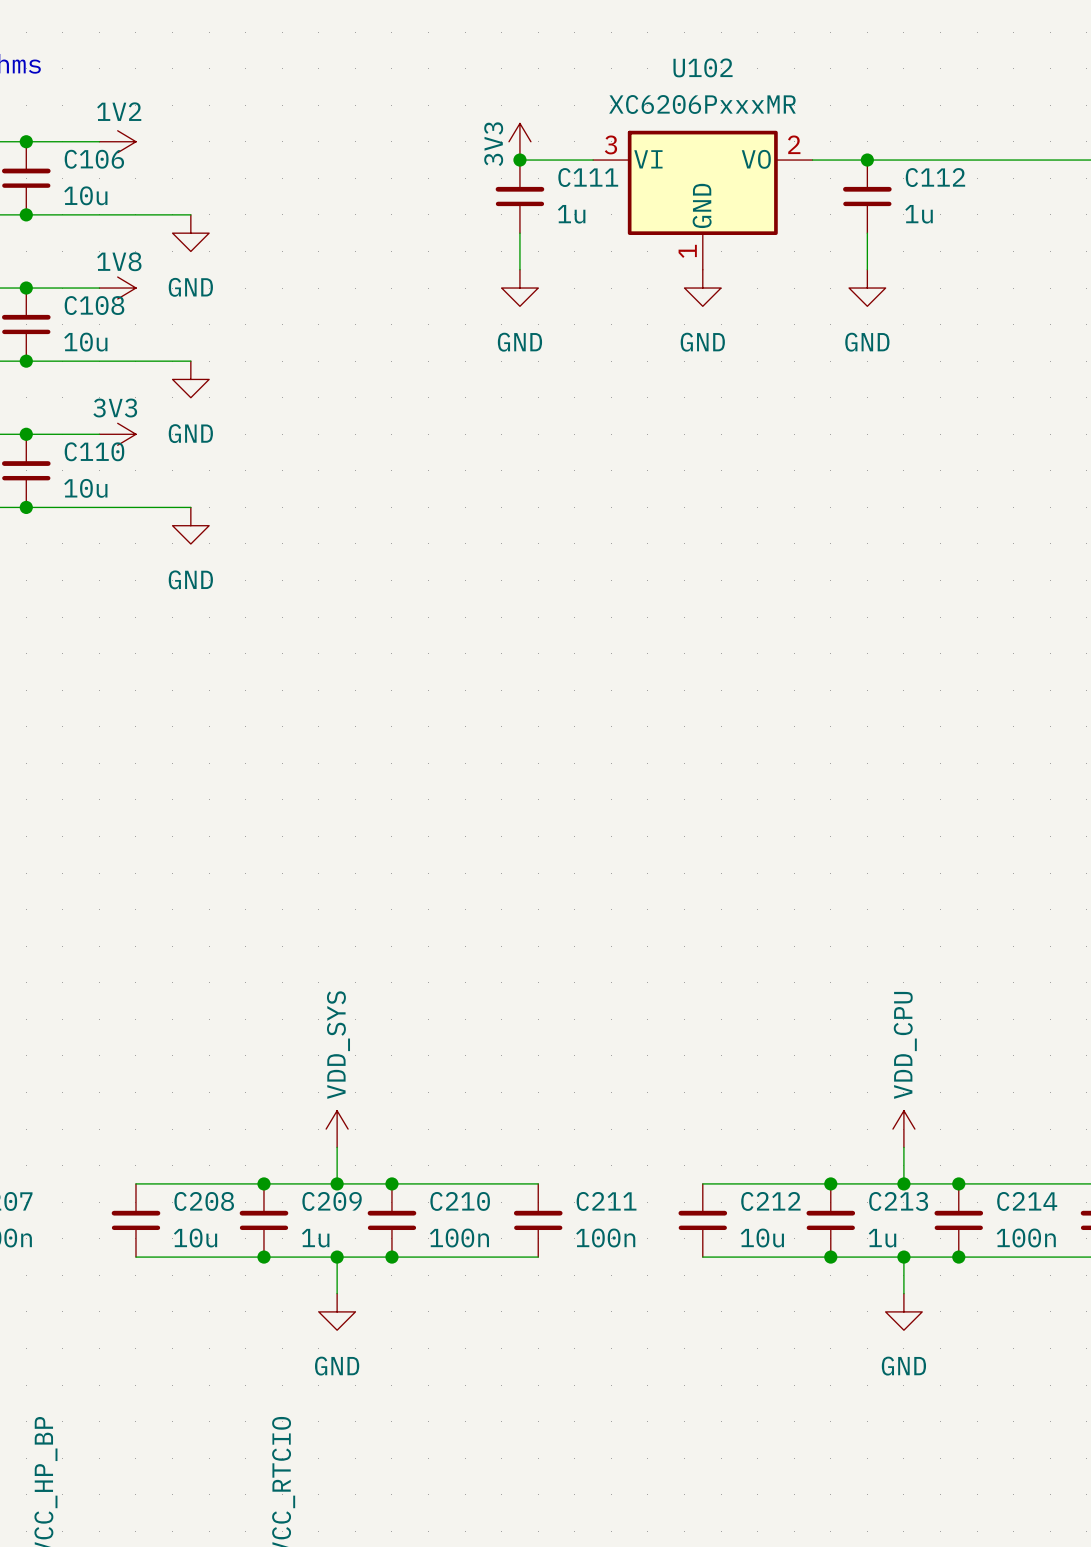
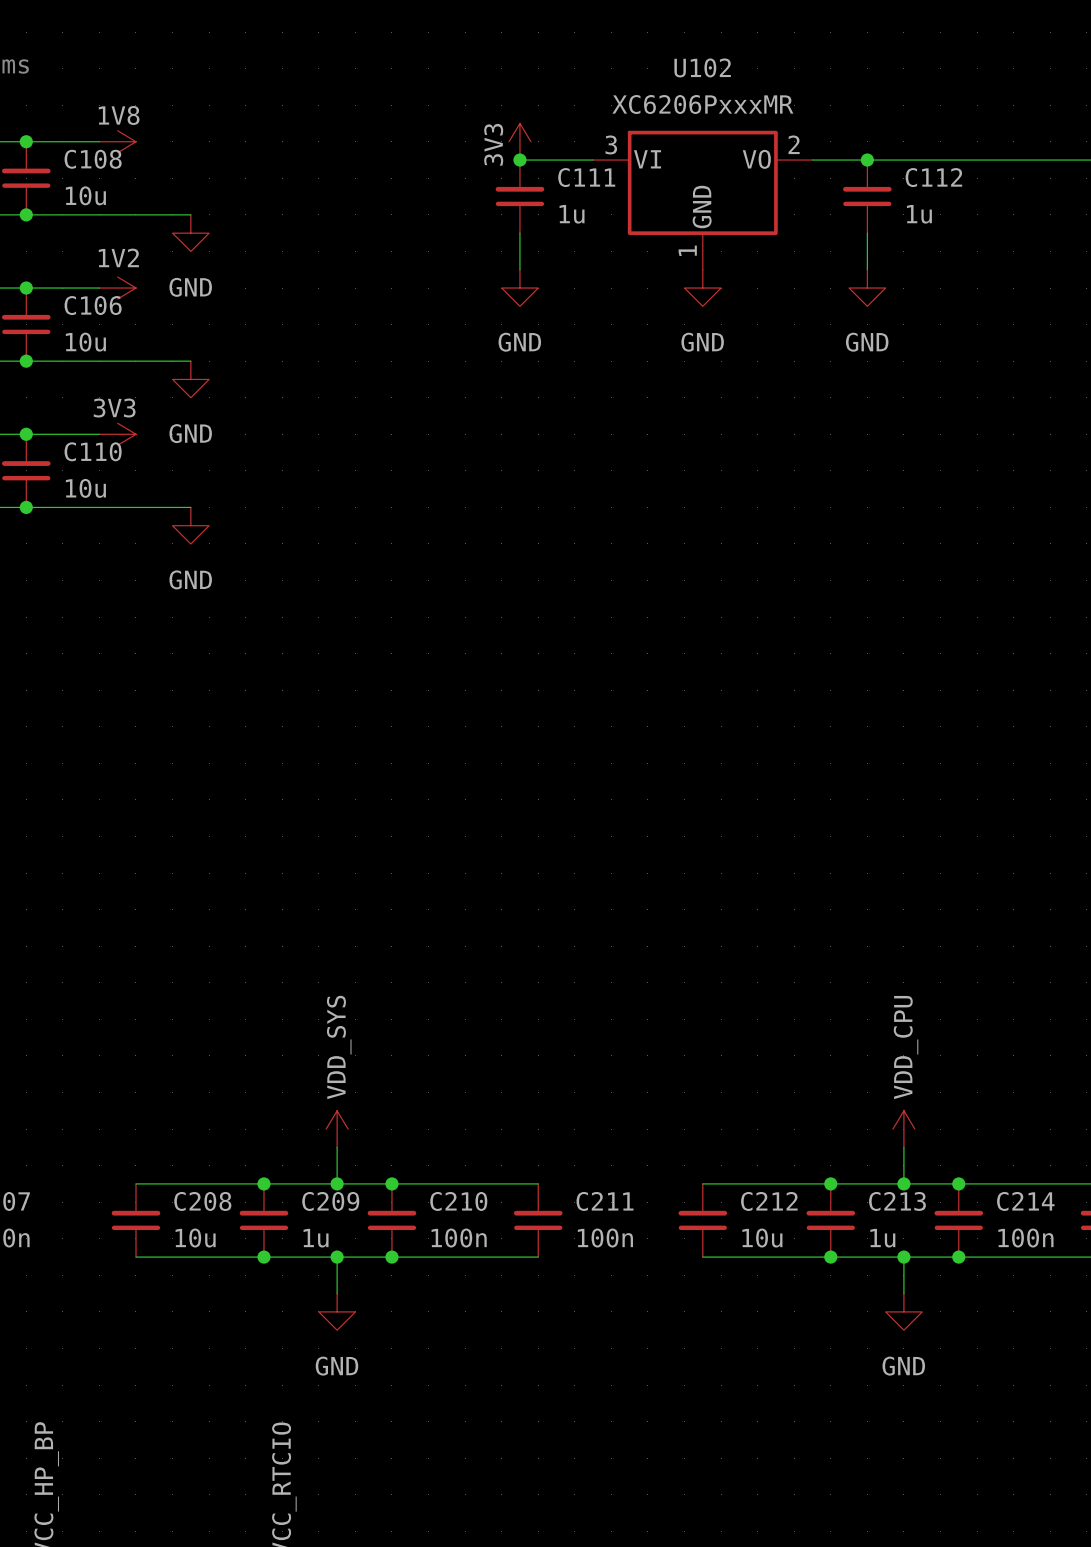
power symbol: 1V2 (117, 141) -> 1V8 (117, 141)
C106 name: C106 (94, 159) -> C108 (93, 159)
power symbol: 1V8 (117, 288) -> 1V2 (117, 288)
C108 name: C108 (94, 305) -> C106 (93, 305)

